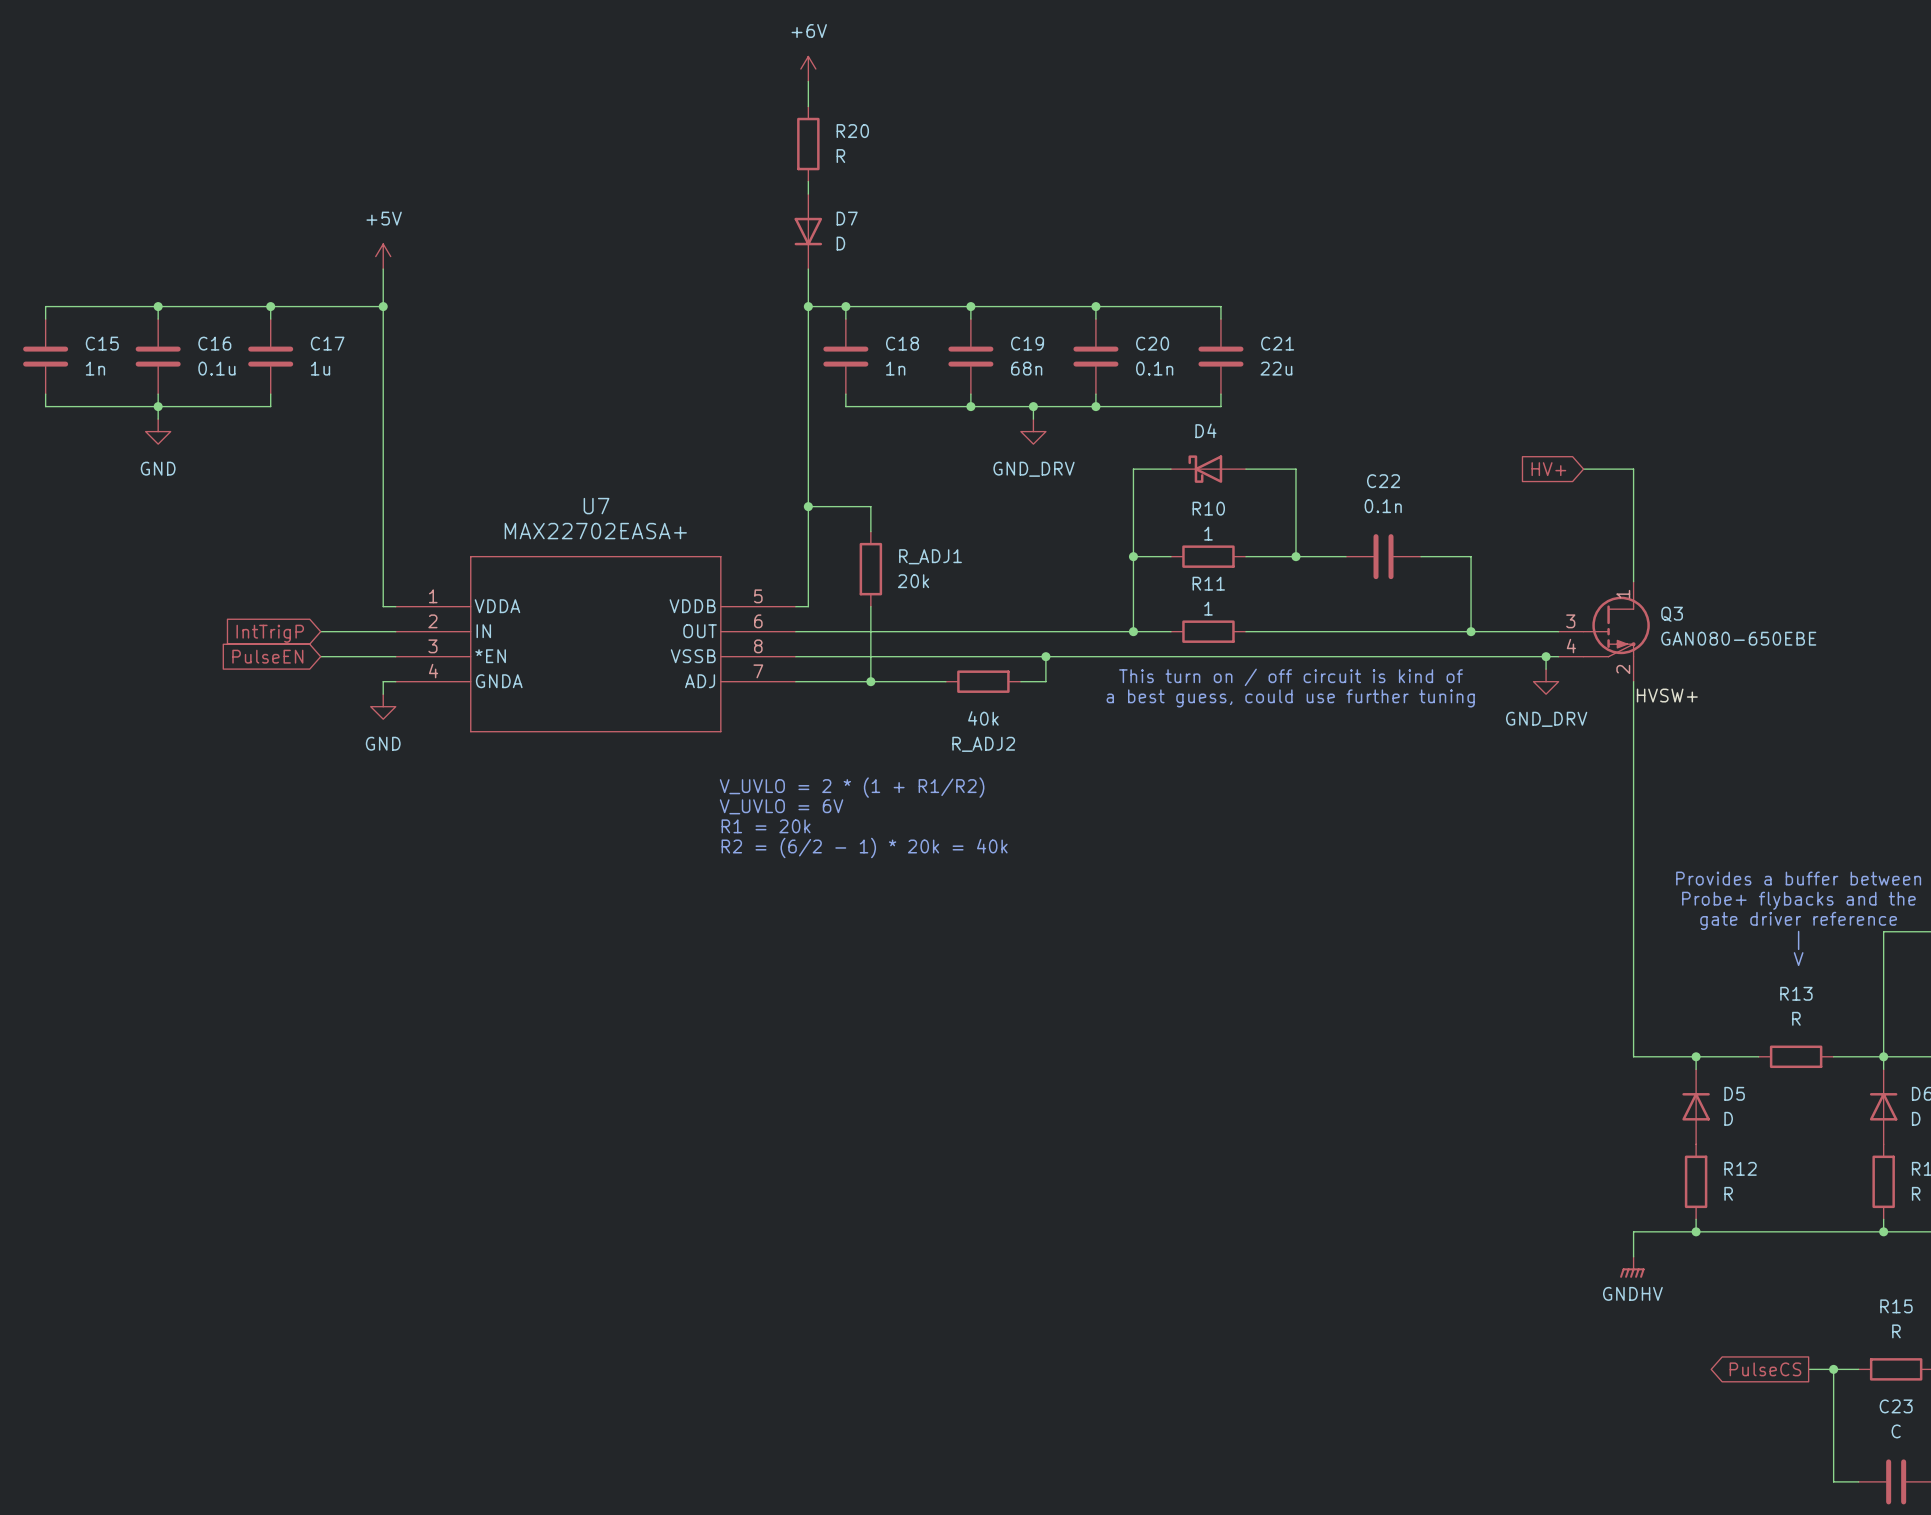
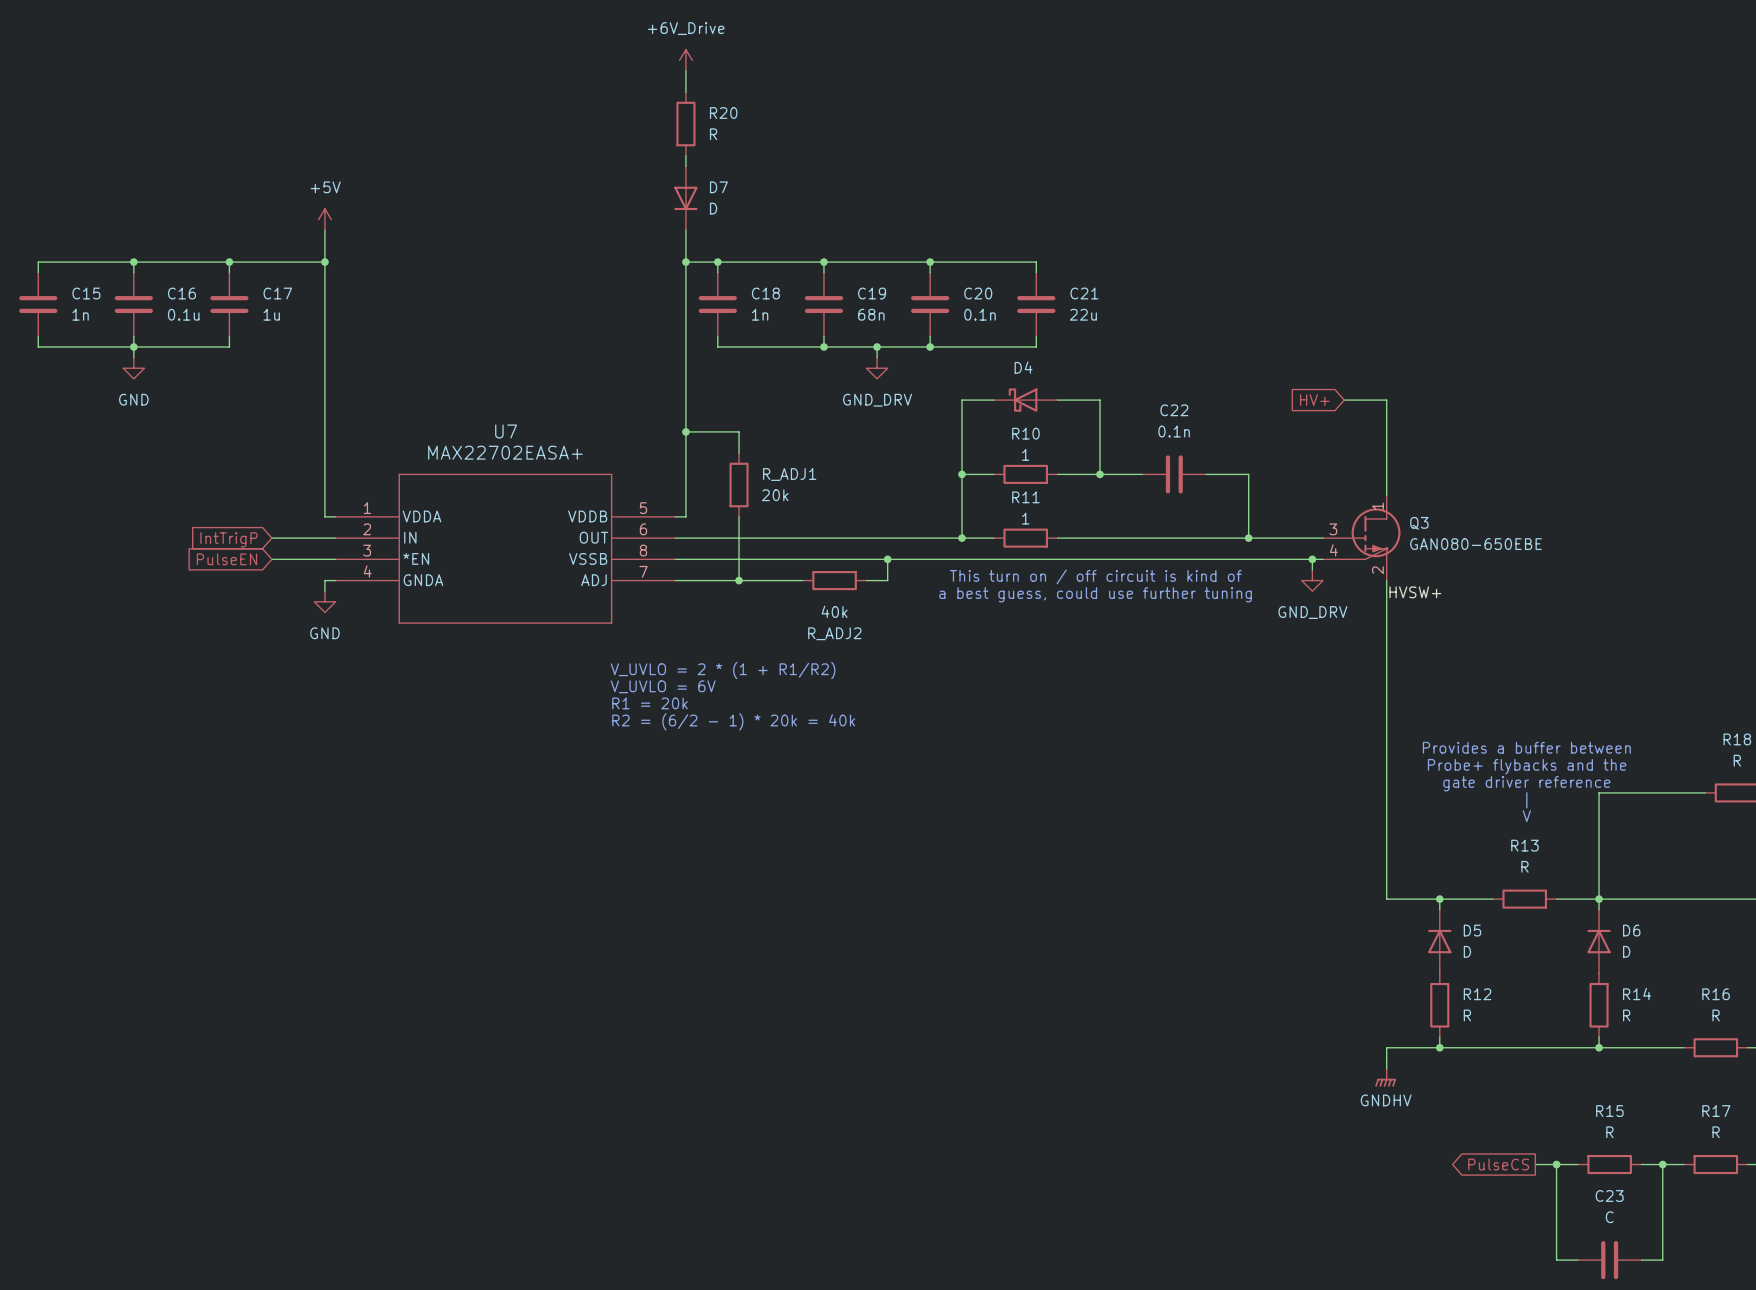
power symbol: +6V (808, 69) -> +6V_Drive (685, 60)

